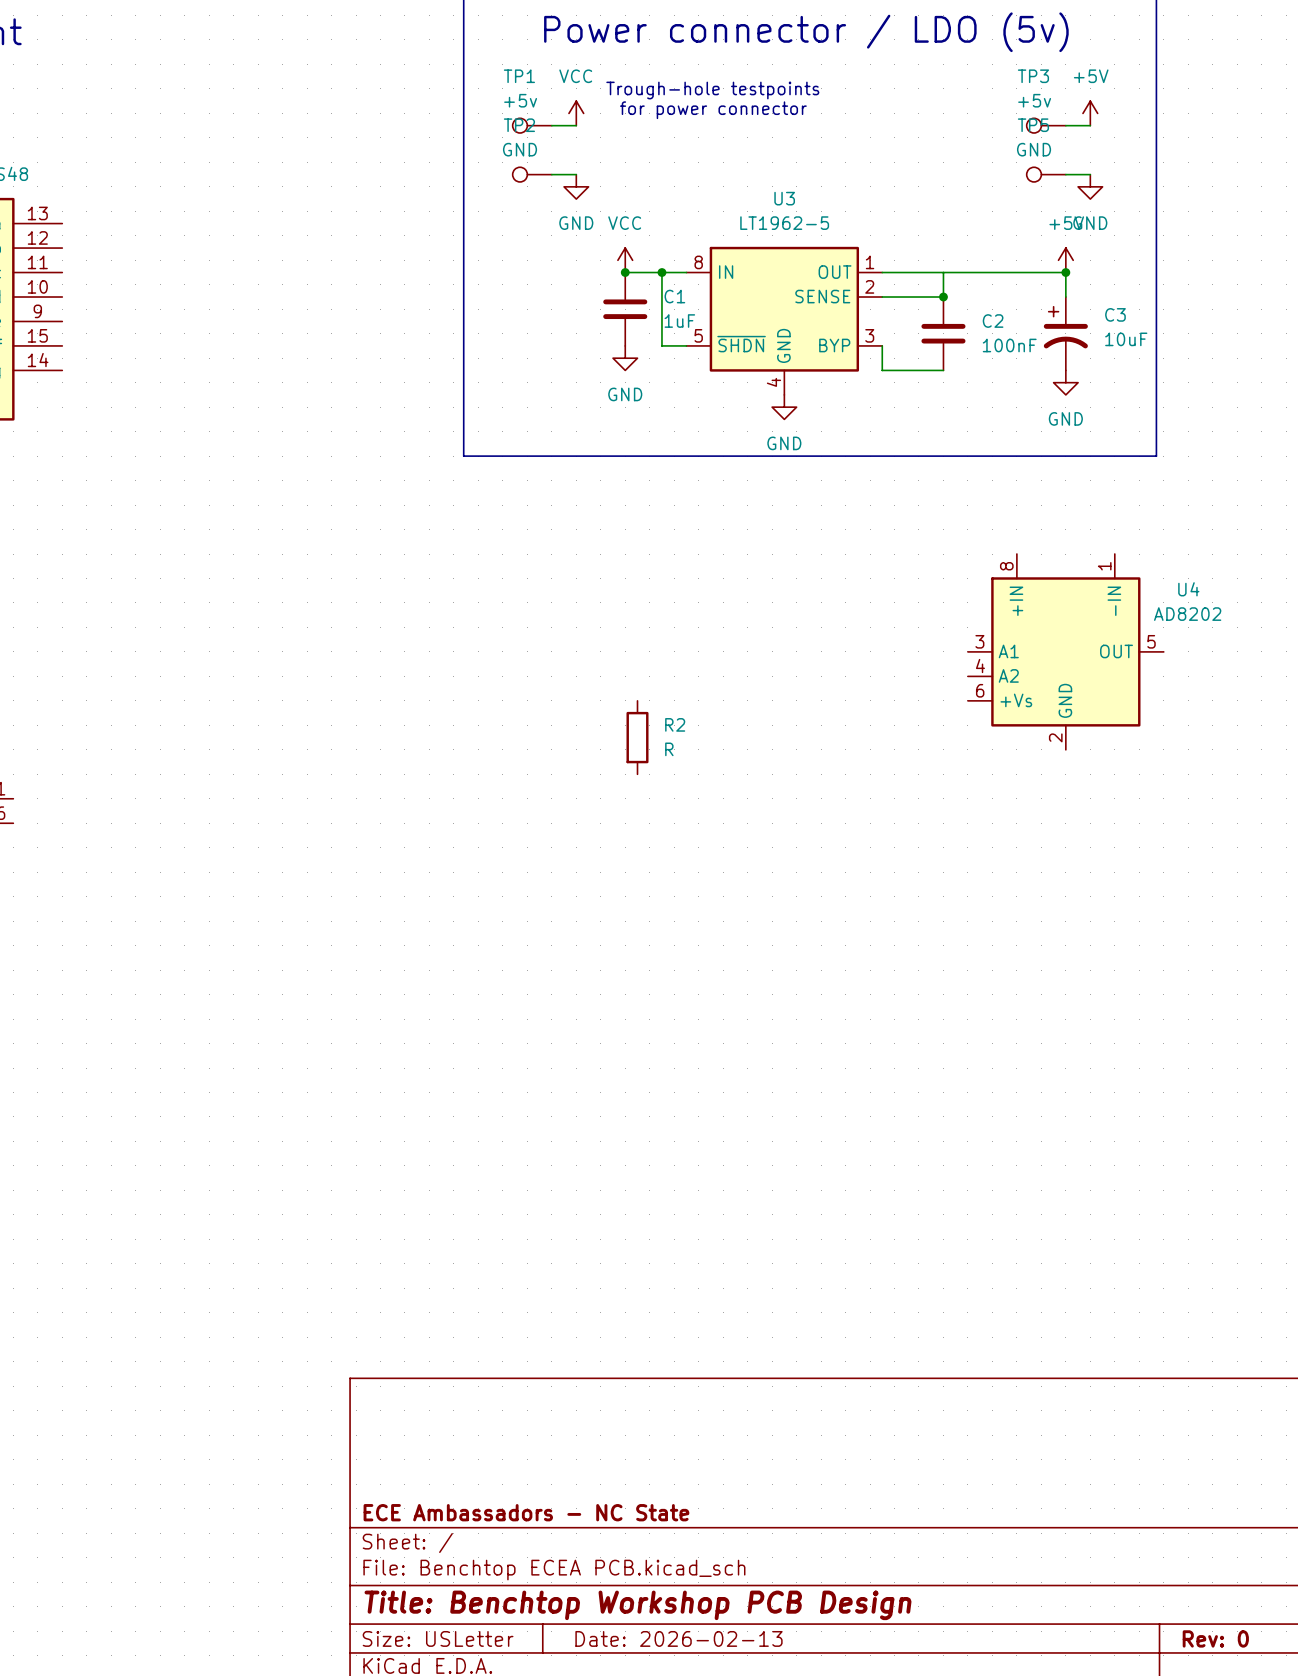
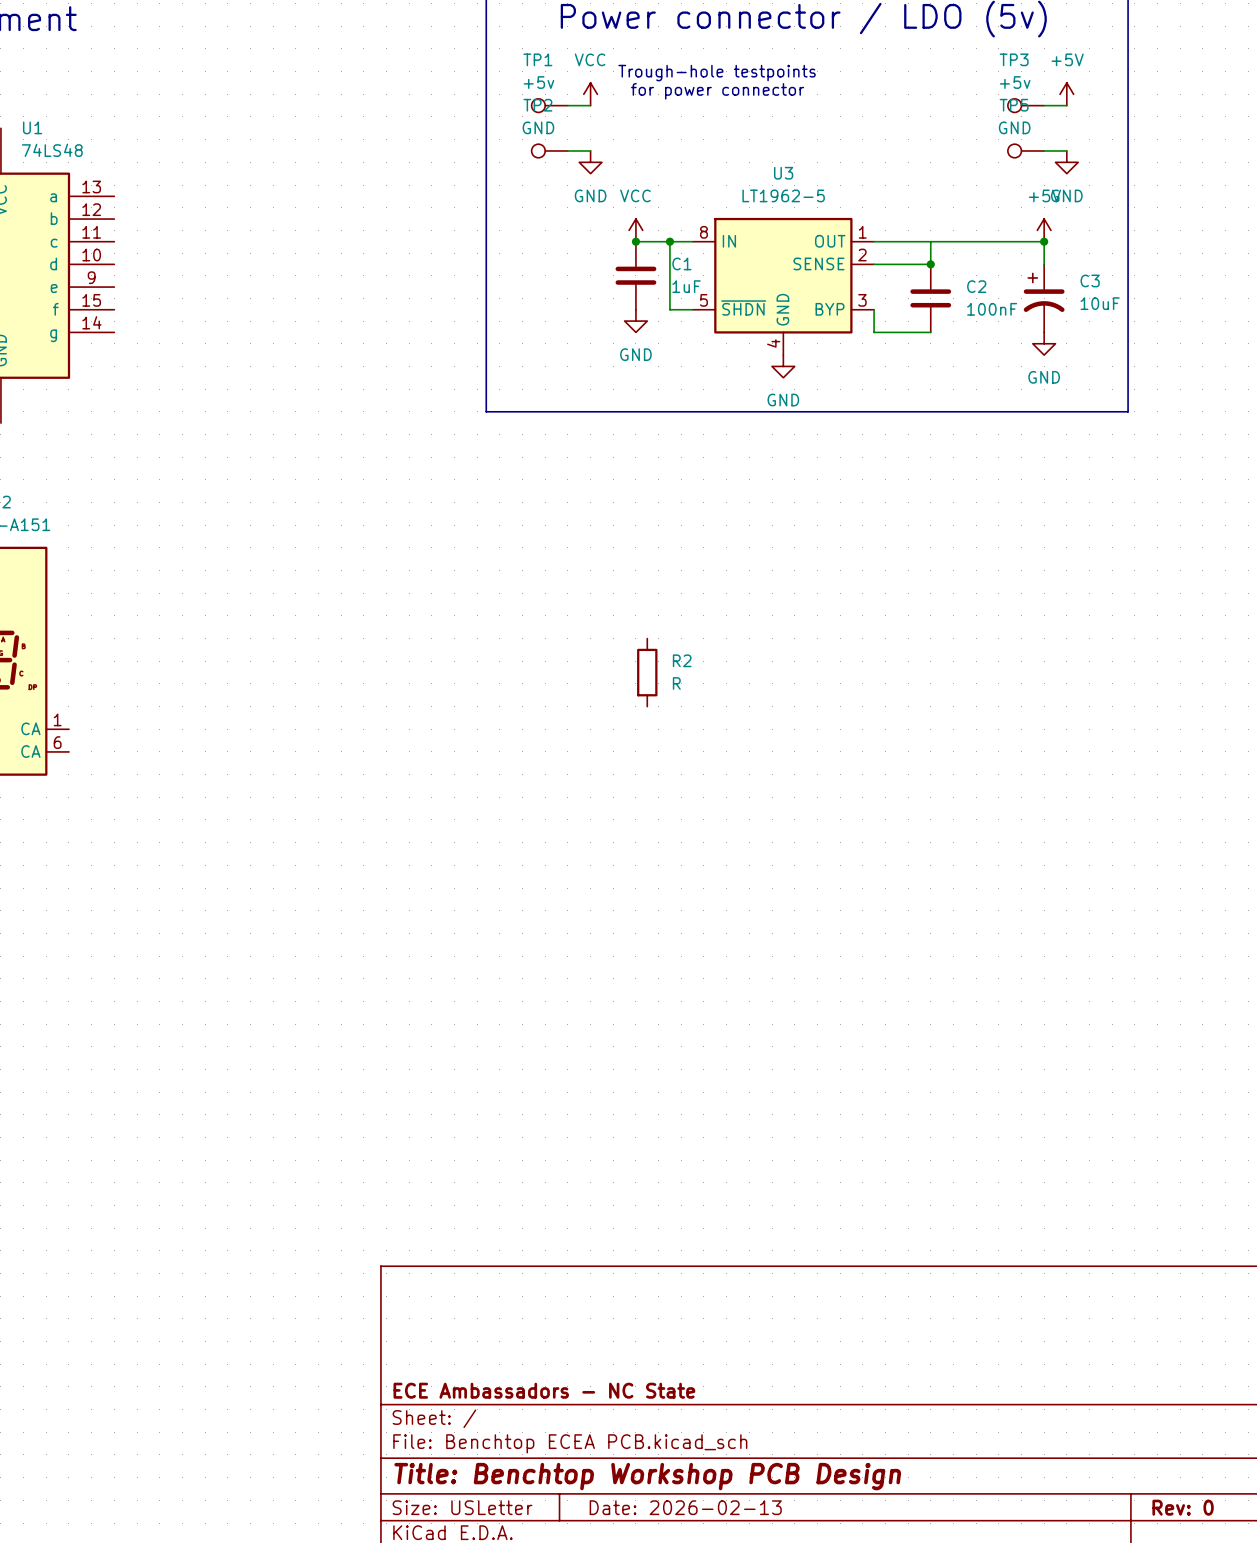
U4: AD8202 (1065, 651) -> none

